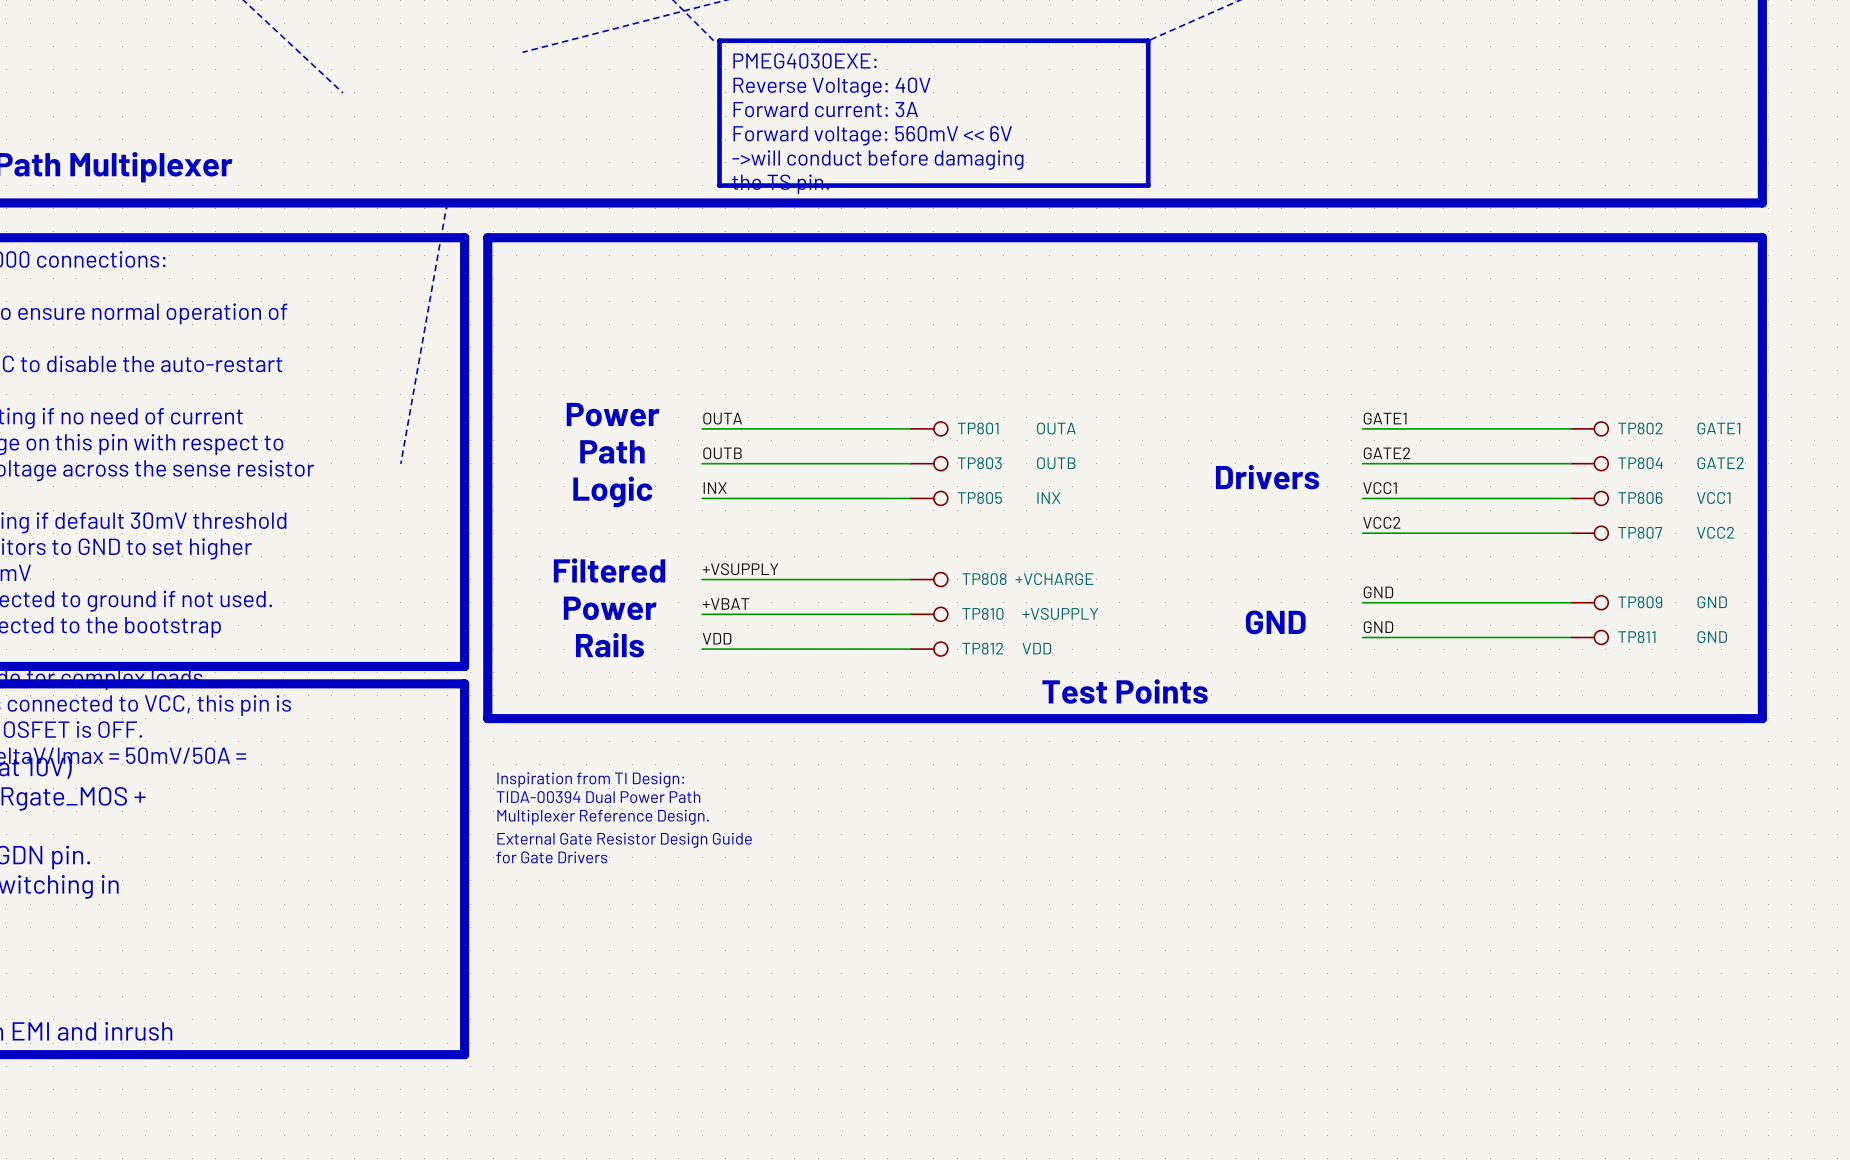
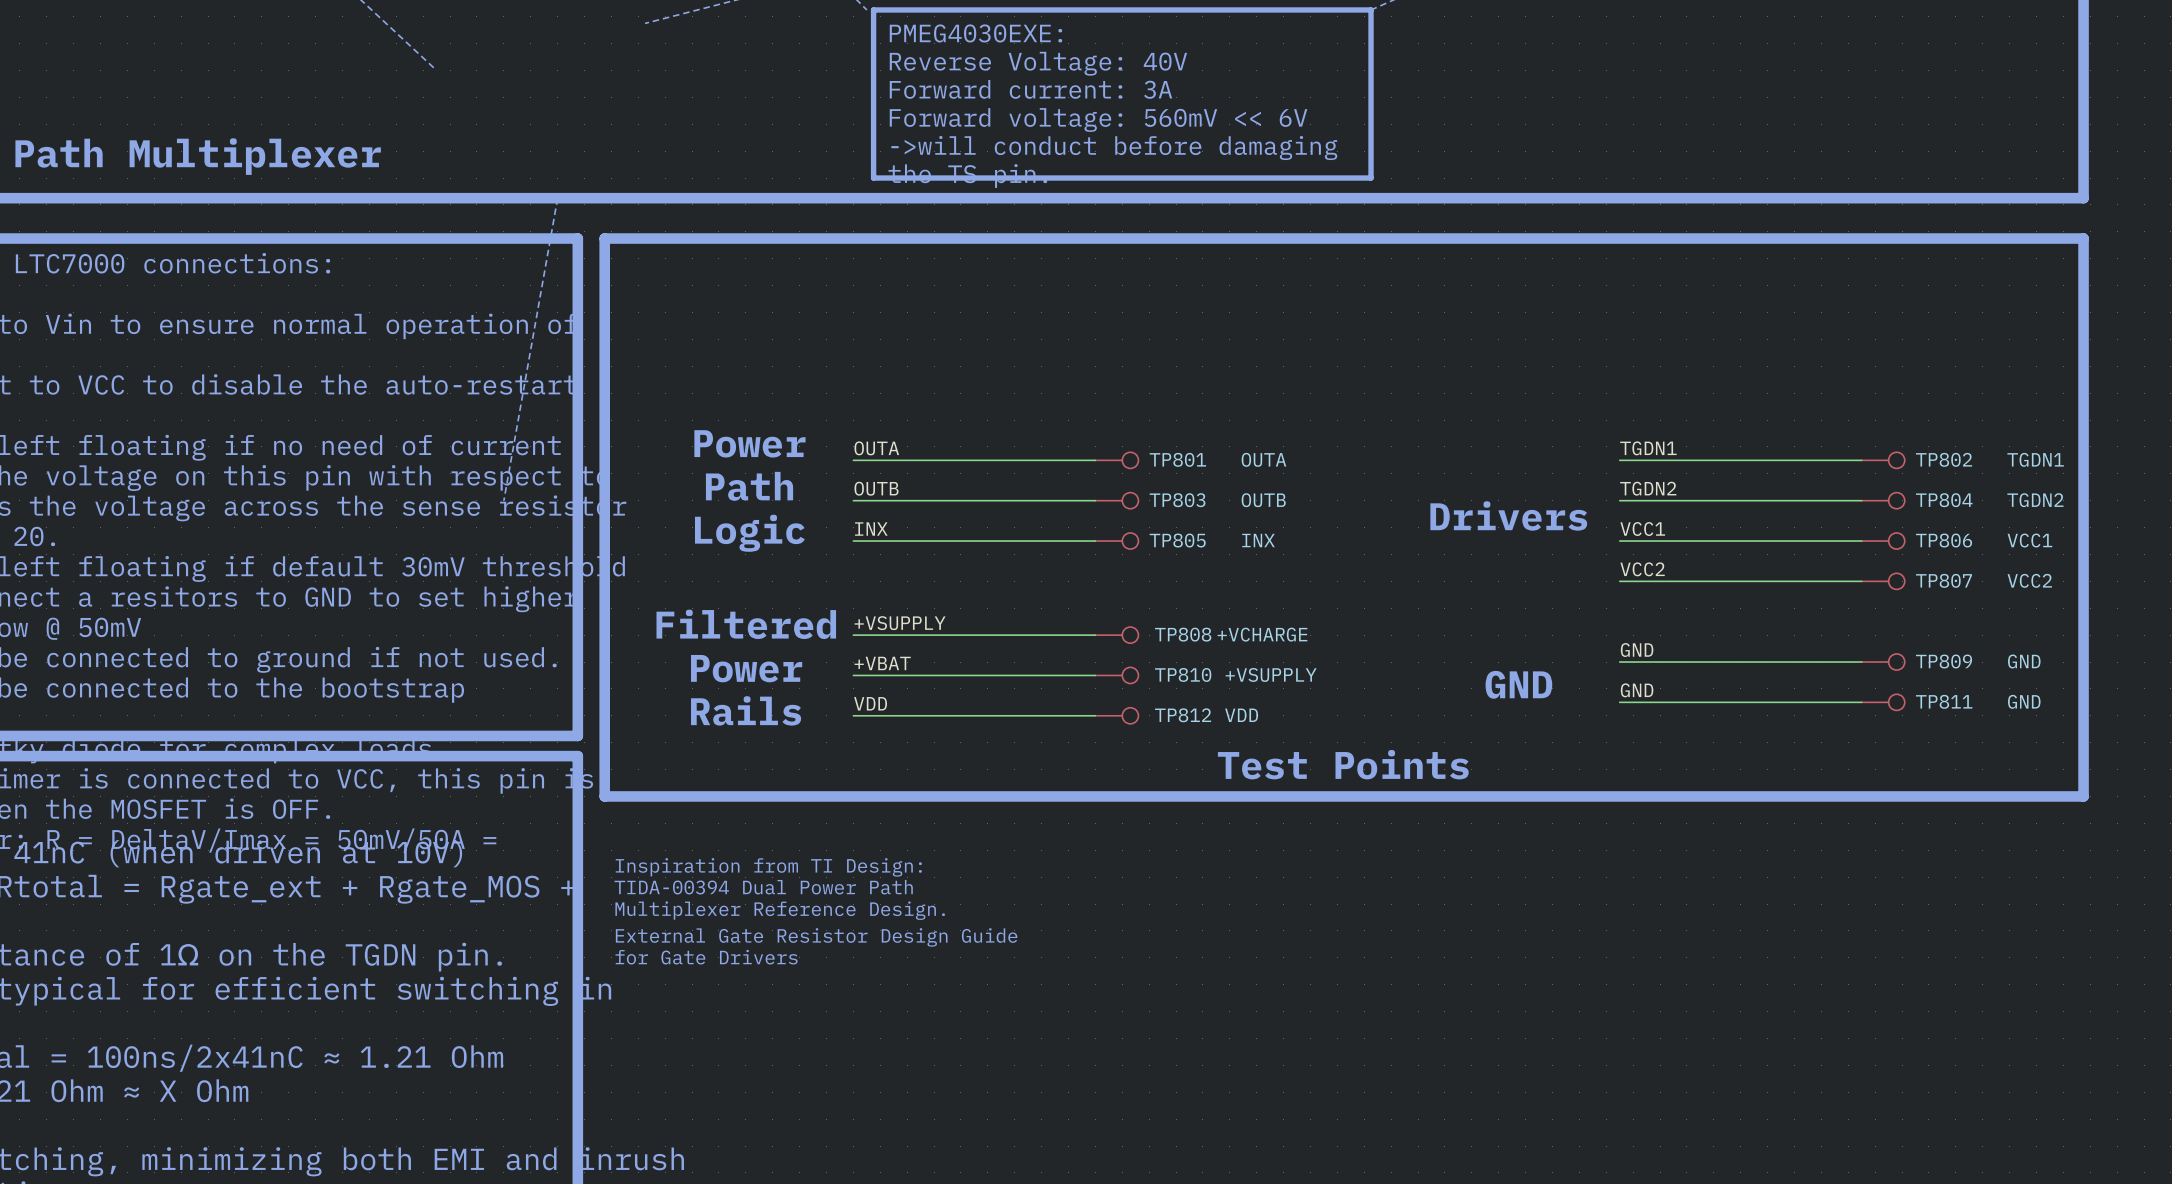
label: GATE1 (1385, 418) -> TGDN1 (1648, 448)
TP802 value: GATE1 (1718, 428) -> TGDN1 (2035, 459)
label: GATE2 (1386, 453) -> TGDN2 (1648, 488)
TP804 value: GATE2 (1720, 463) -> TGDN2 (2035, 500)

